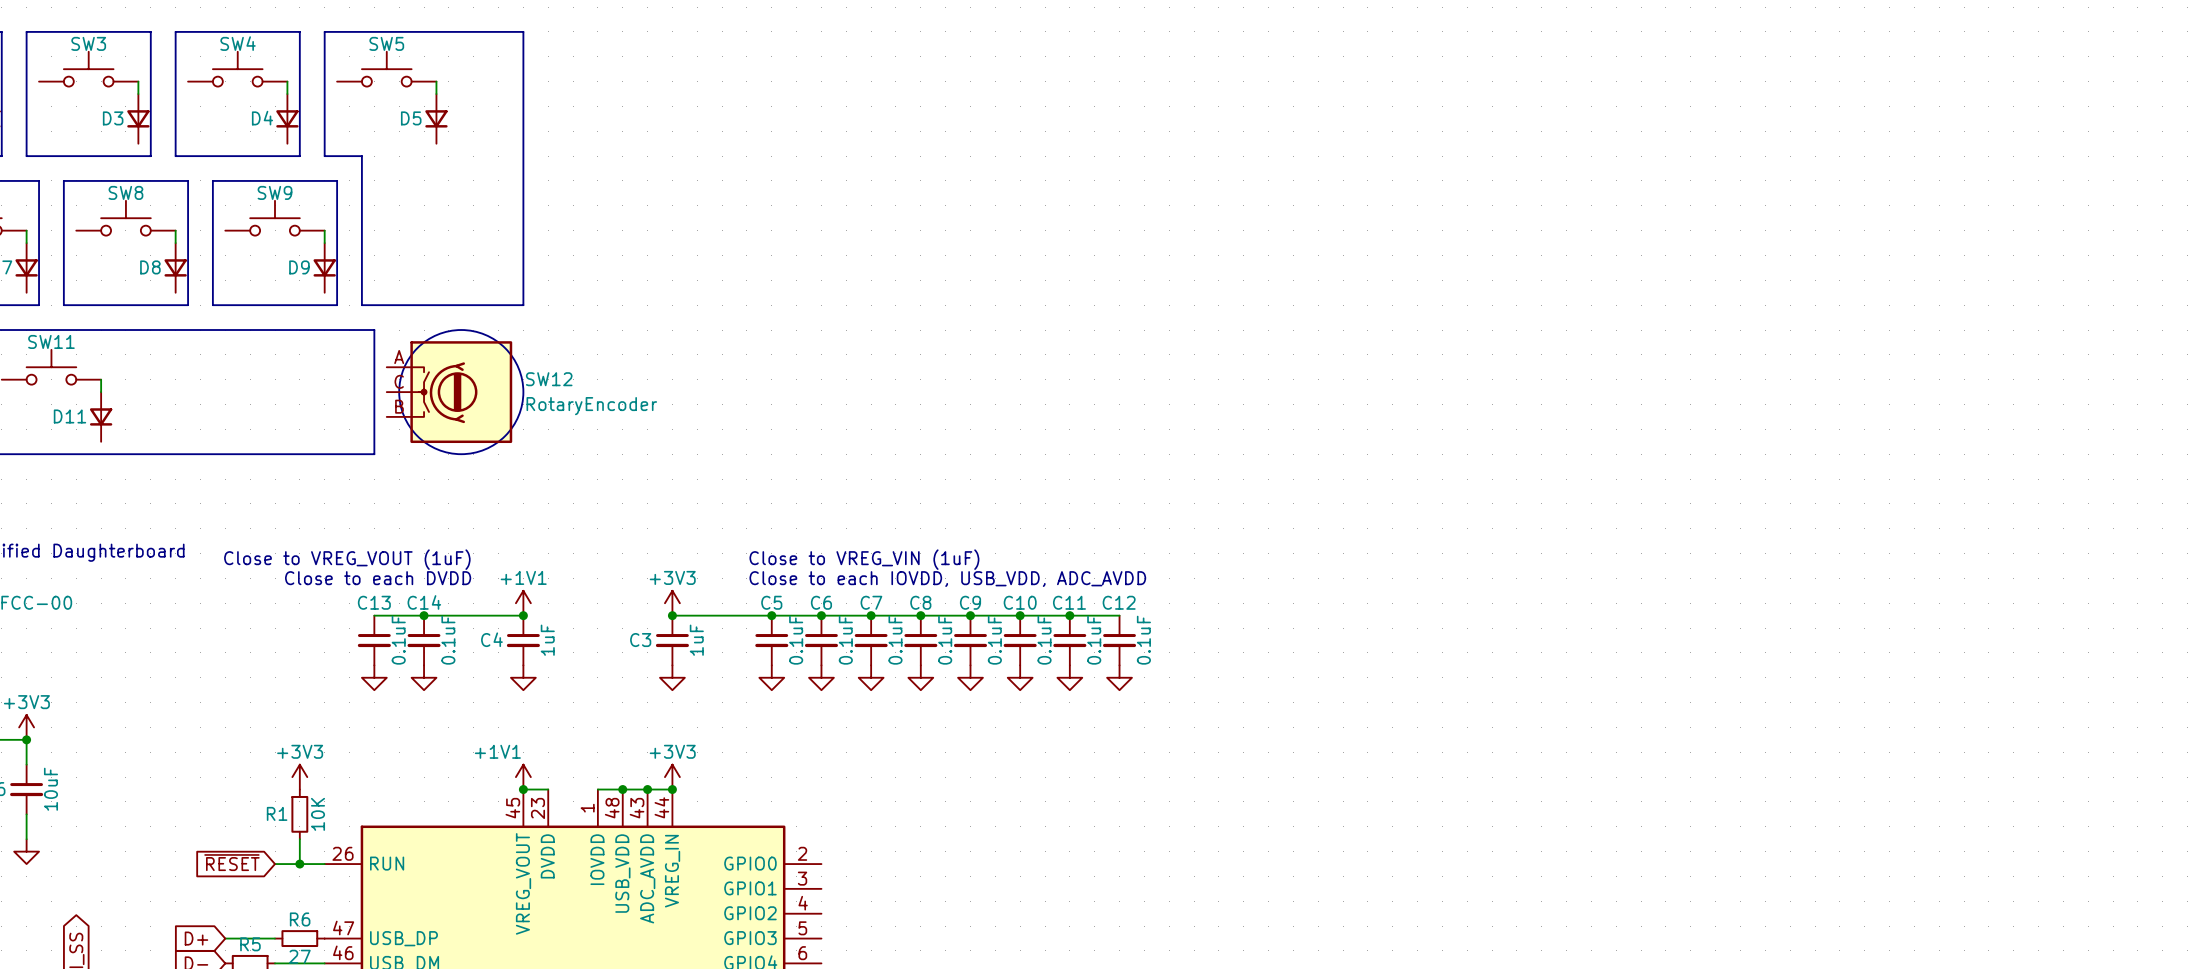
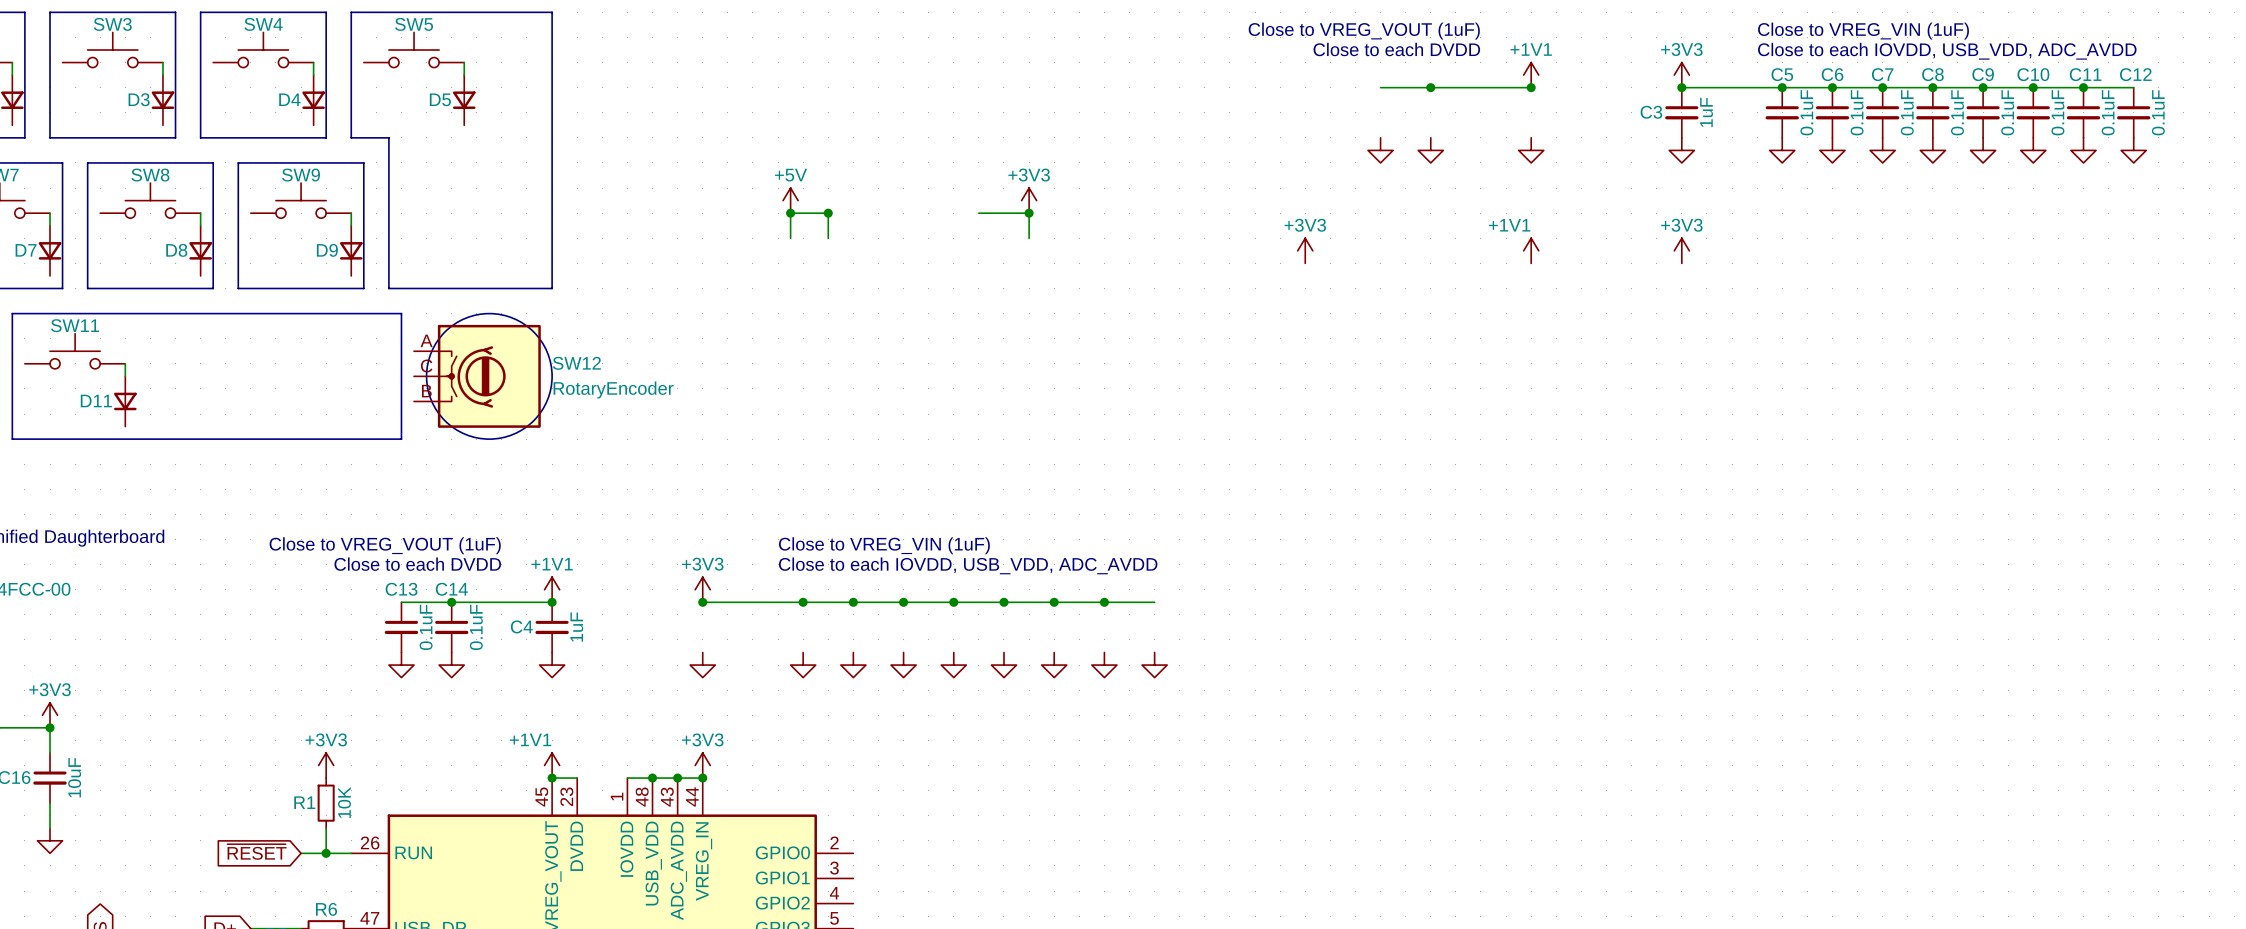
text: none -> Close to VREG_VOUT (1uF) (1364, 31)
text: none -> Close to VREG_VIN (1uF) (1863, 31)
text: none -> Close to each DVDD (1396, 49)
text: none -> Close to each IOVDD, USB_VDD, ADC_AVDD (1947, 51)
power symbol: none -> +1V1 (1531, 75)
power symbol: none -> +3V3 (1681, 75)
wire: none -> (1380, 87) (1531, 87)
junction: none -> (1430, 87)
junction: none -> (1531, 87)
wire: none -> (1681, 87) (2133, 87)
junction: none -> (1681, 87)
junction: none -> (1782, 87)
junction: none -> (1832, 87)
junction: none -> (1882, 87)
junction: none -> (1932, 87)
junction: none -> (1983, 87)
junction: none -> (2033, 87)
junction: none -> (2083, 87)
power symbol: none -> (1380, 150)
power symbol: none -> (1430, 150)
power symbol: none -> (1531, 150)
power symbol: none -> (1681, 150)
power symbol: none -> (1782, 150)
power symbol: none -> (1832, 150)
power symbol: none -> (1882, 150)
power symbol: none -> (1932, 150)
power symbol: none -> (1983, 150)
power symbol: none -> (2033, 150)
power symbol: none -> (2083, 150)
power symbol: none -> (2133, 150)
power symbol: none -> +5V (790, 200)
power symbol: none -> +3V3 (1029, 200)
junction: none -> (790, 213)
junction: none -> (828, 213)
wire: none -> (978, 213) (1029, 213) (1029, 238)
junction: none -> (1029, 213)
wire: none -> (790, 238) (790, 213) (828, 213) (828, 238)
power symbol: none -> +3V3 (1305, 250)
power symbol: none -> +1V1 (1531, 250)
power symbol: none -> +3V3 (1681, 250)
C3 position: (672, 640) -> (1681, 112)
C5 position: (771, 640) -> (1782, 112)
C6 position: (821, 640) -> (1832, 112)
C7 position: (871, 640) -> (1882, 112)
C8 position: (920, 640) -> (1932, 112)
C9 position: (970, 640) -> (1983, 112)
C10 position: (1020, 640) -> (2033, 112)
C11 position: (1069, 640) -> (2083, 112)
C12 position: (1119, 640) -> (2133, 112)

